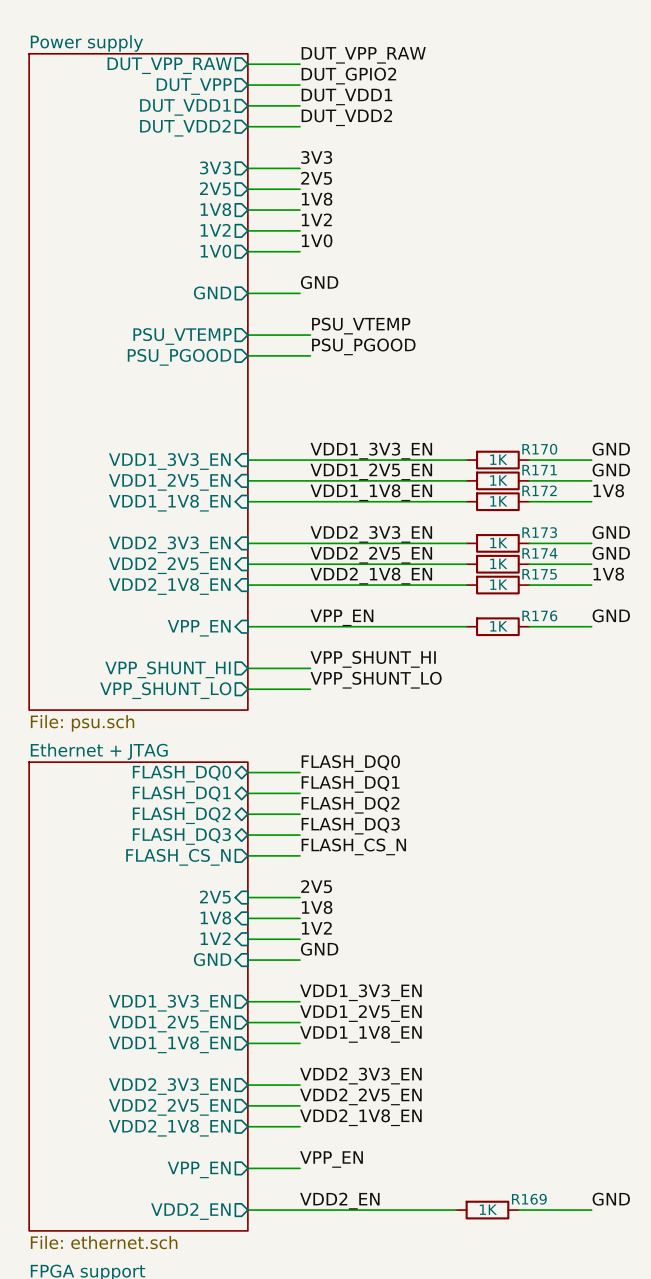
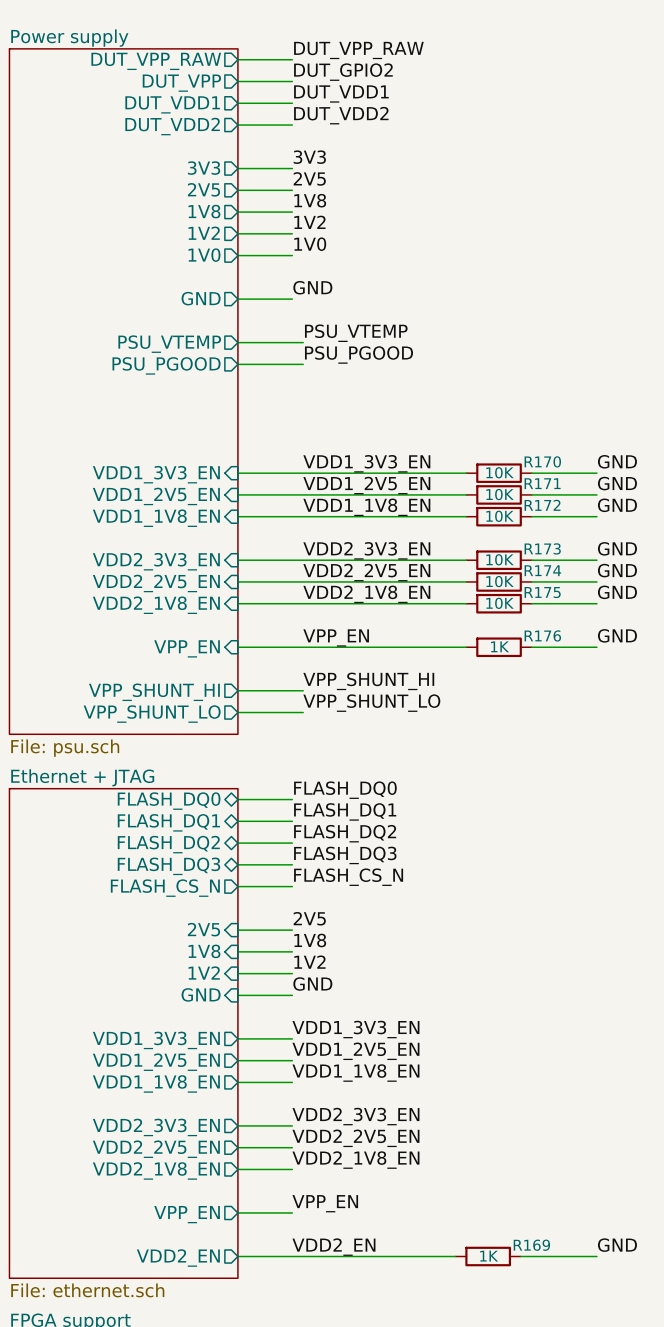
R170 value: 1K (498, 459) -> 10K (500, 472)
R171 value: 1K (498, 480) -> 10K (500, 494)
label: 1V8 (608, 490) -> GND (617, 505)
R172 value: 1K (498, 501) -> 10K (500, 516)
R173 value: 1K (498, 543) -> 10K (500, 559)
R174 value: 1K (498, 563) -> 10K (500, 581)
label: 1V8 (608, 574) -> GND (617, 592)
R175 value: 1K (498, 584) -> 10K (500, 603)

